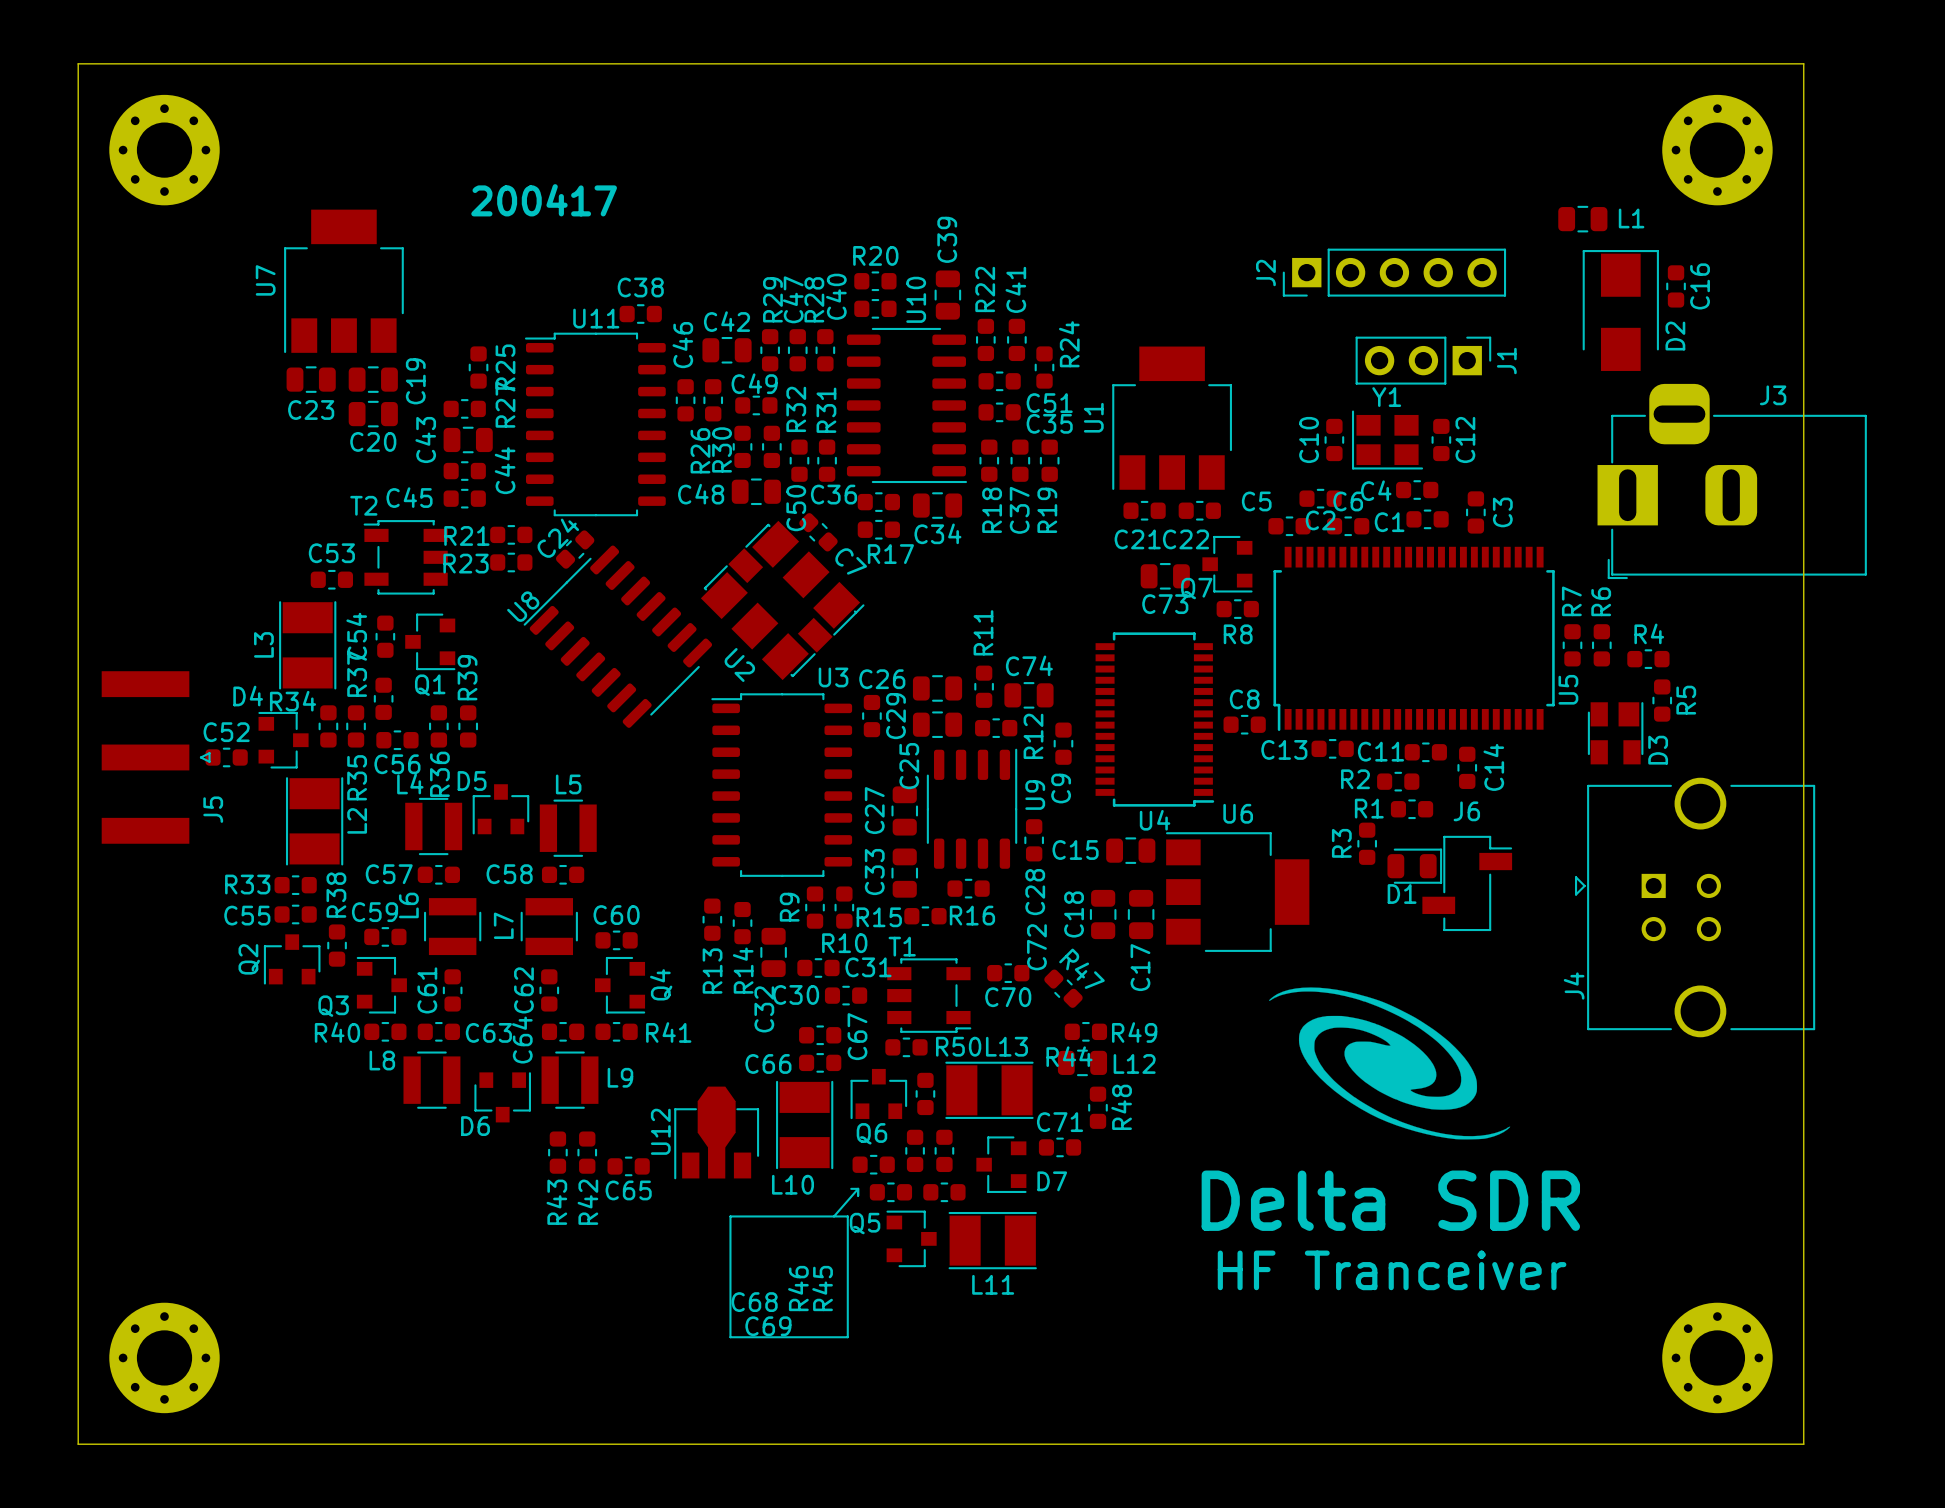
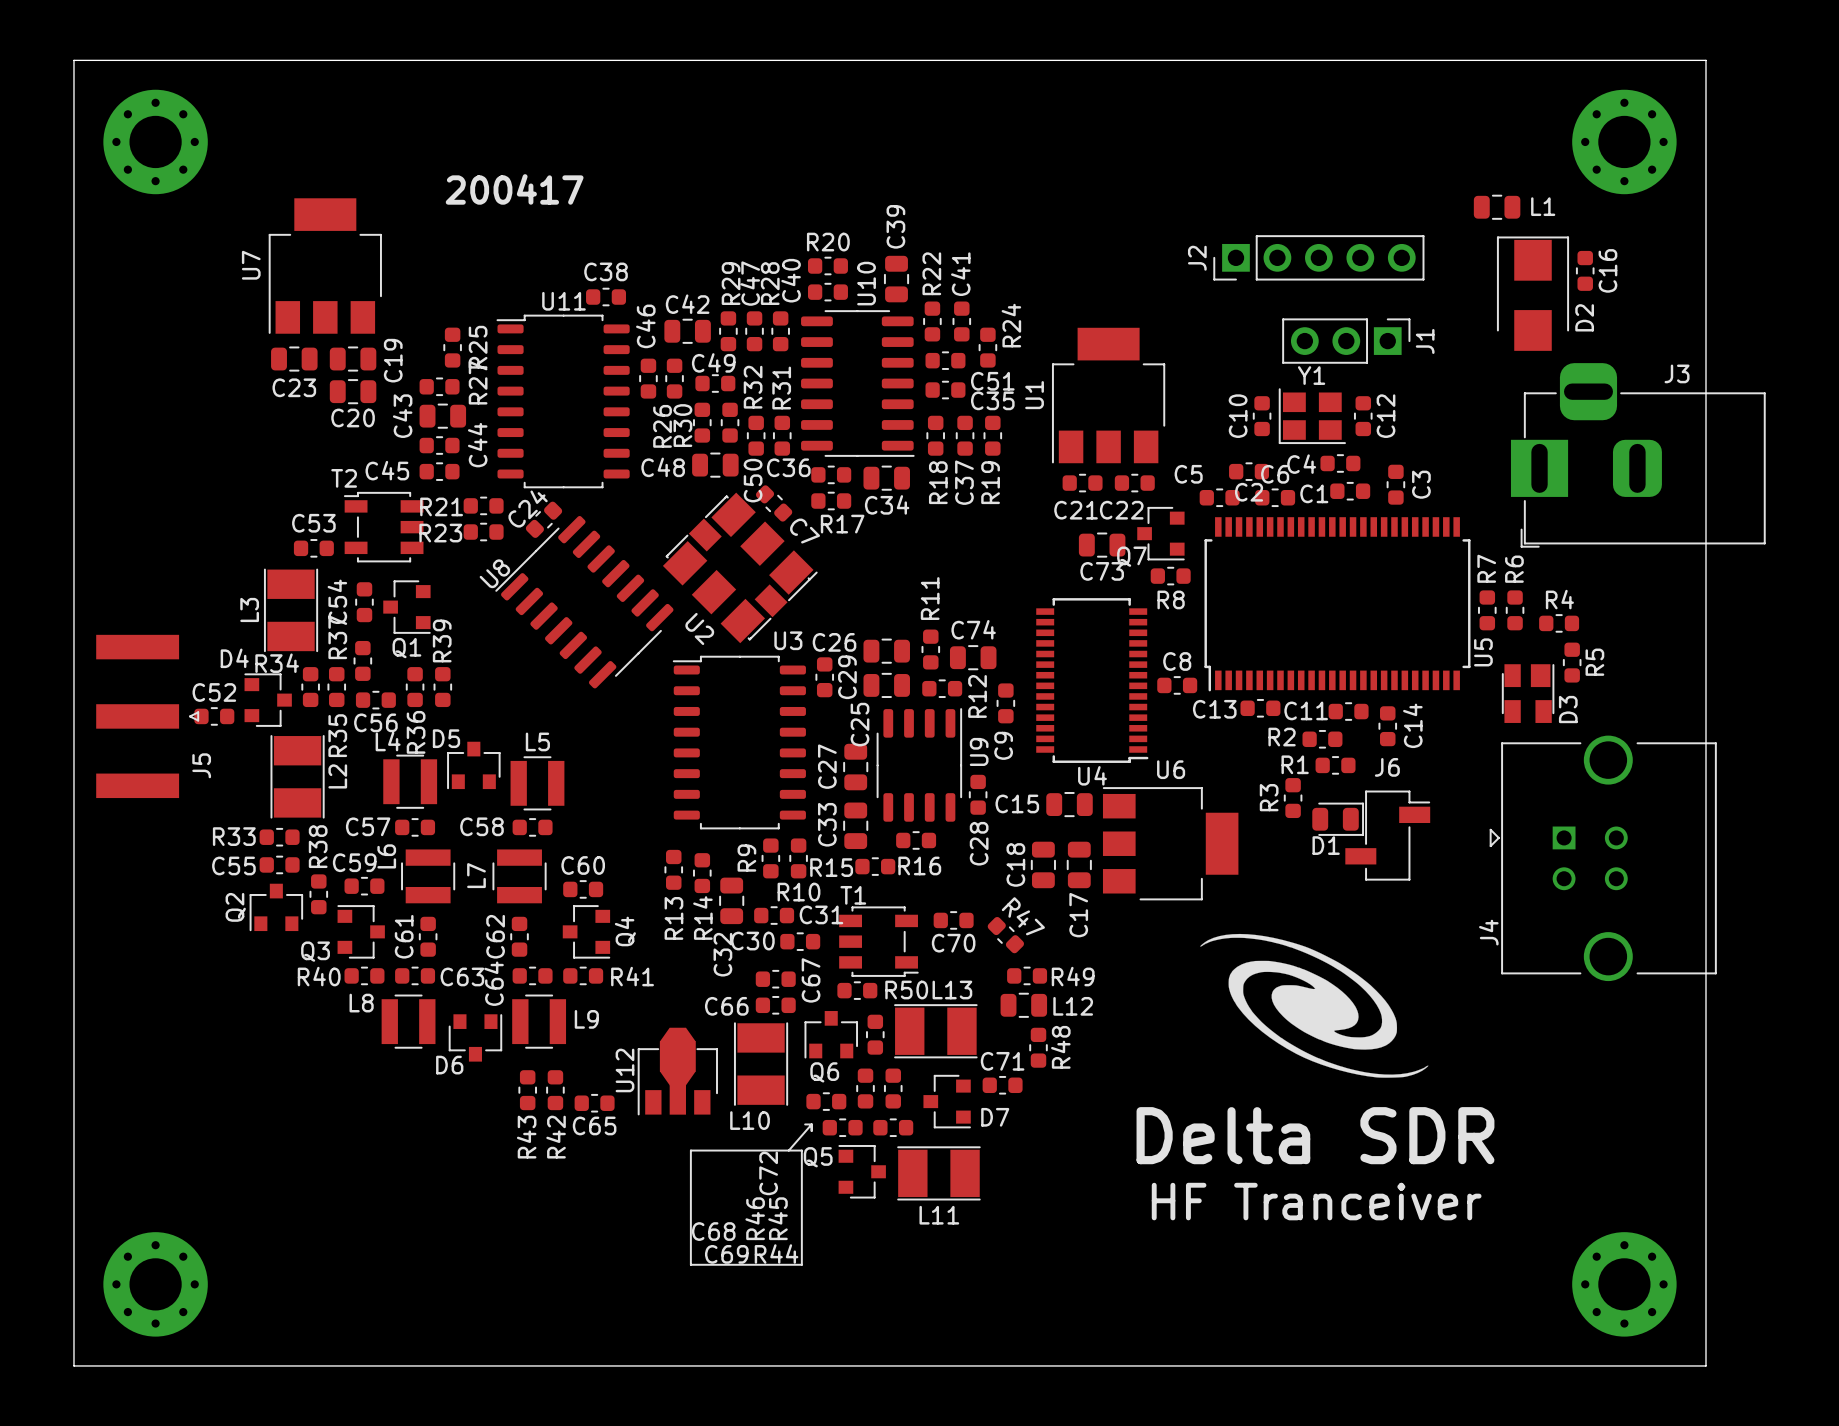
C72 name position: C72 (1036, 947) -> C72 (768, 1173)
R44 name position: R44 (1069, 1056) -> R44 (776, 1254)

